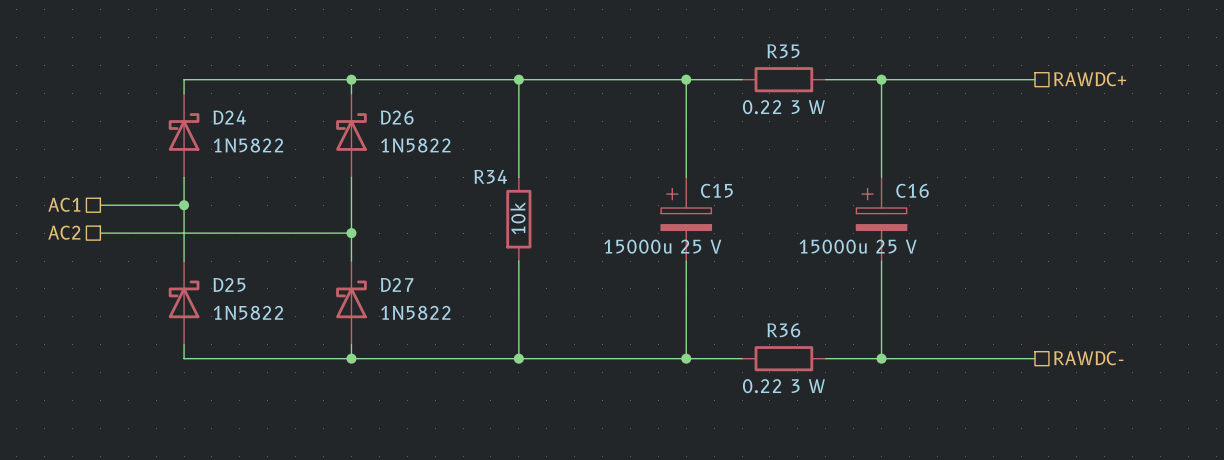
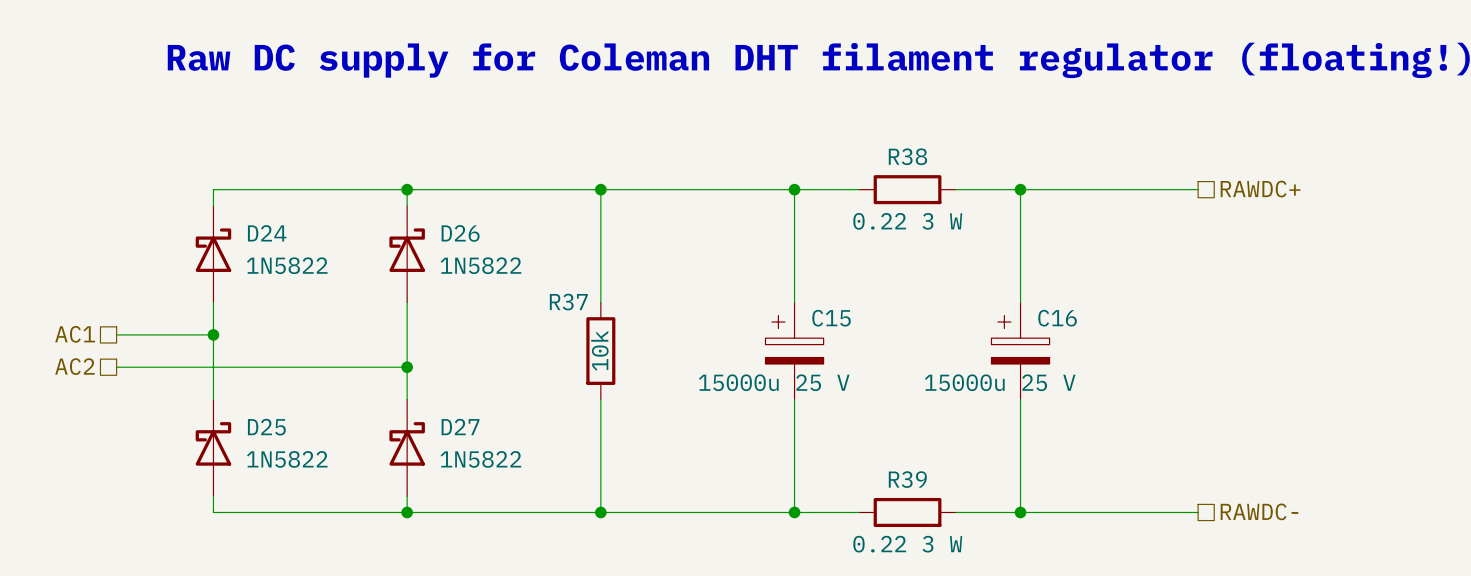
R35 name: R35 (783, 51) -> R38 (907, 156)
R34 name: R34 (490, 176) -> R37 (568, 302)
R36 name: R36 (783, 330) -> R39 (907, 479)

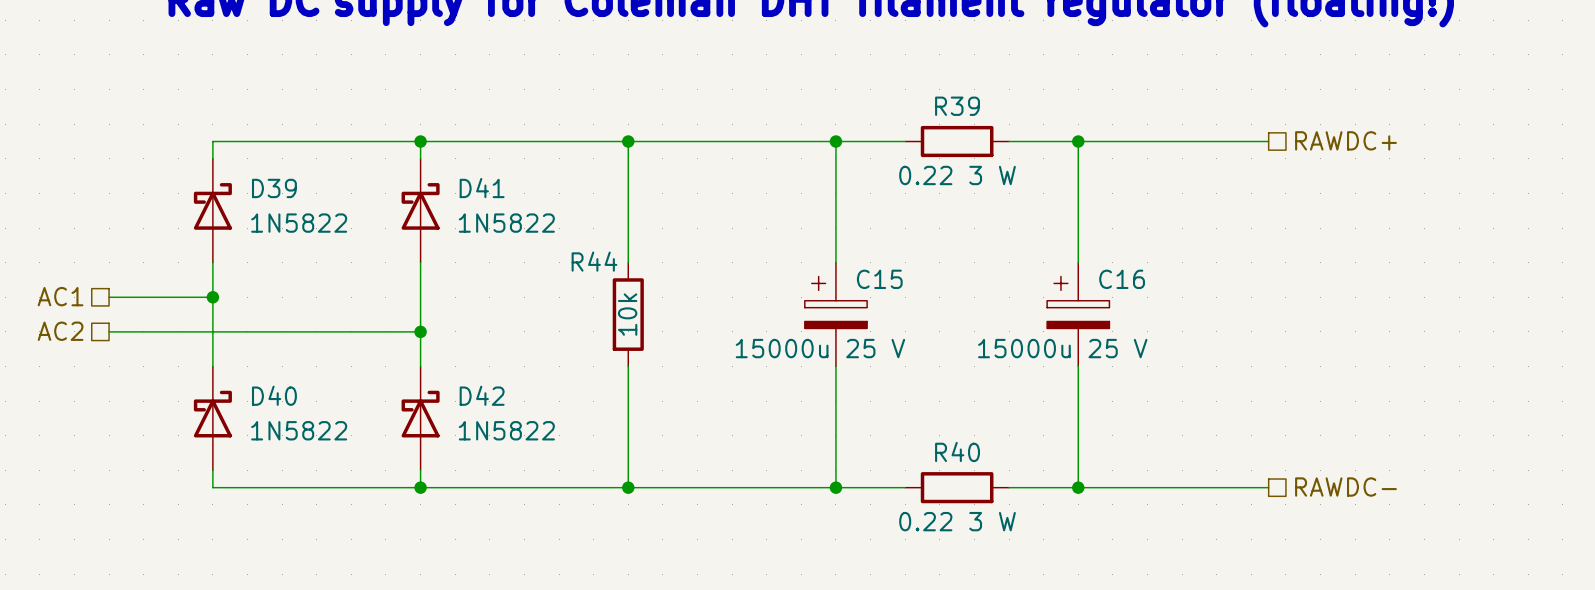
R38 name: R38 (907, 156) -> R39 (957, 106)
D24 name: D24 (267, 233) -> D39 (274, 188)
D26 name: D26 (460, 233) -> D41 (482, 188)
R37 name: R37 (568, 302) -> R44 (594, 261)
D25 name: D25 (266, 427) -> D40 (274, 395)
D27 name: D27 (460, 427) -> D42 (482, 395)
R39 name: R39 (907, 479) -> R40 (957, 451)

